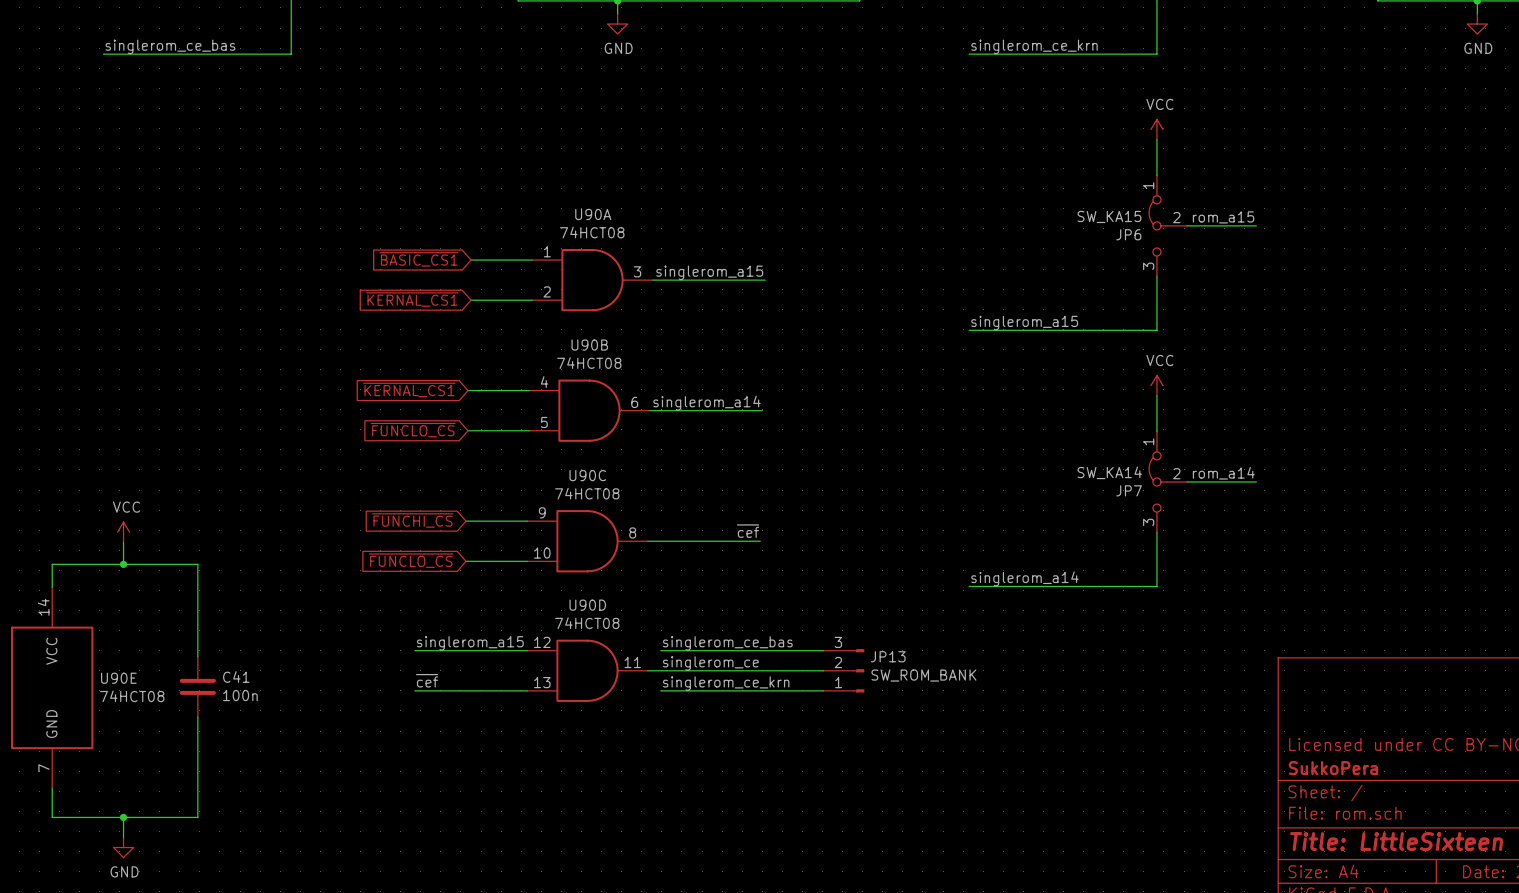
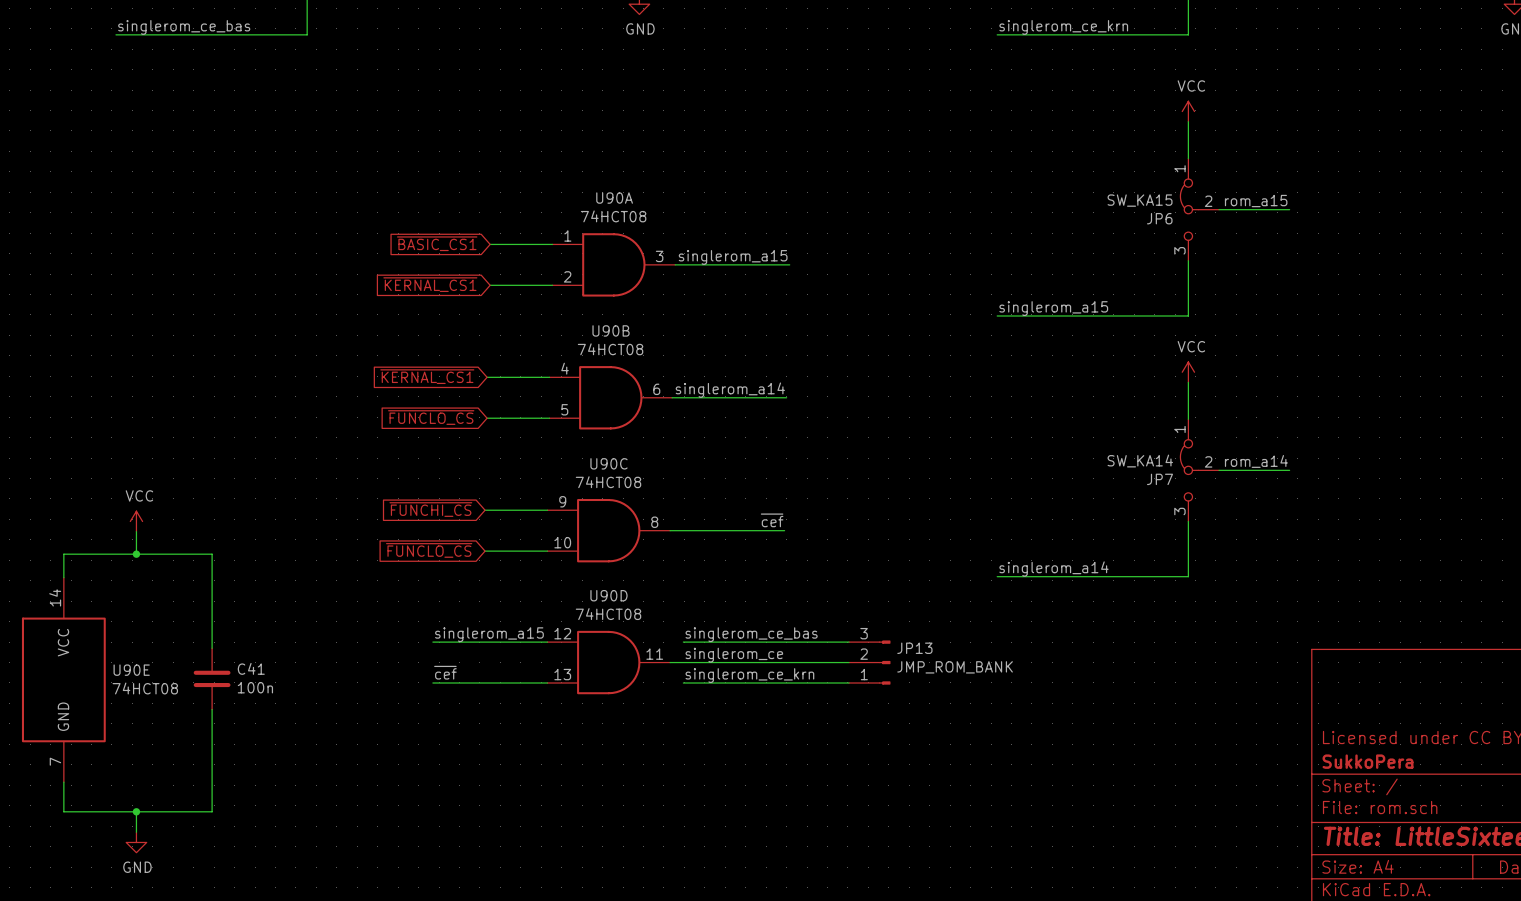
JP13 value: SW_ROM_BANK (923, 675) -> JMP_ROM_BANK (955, 667)

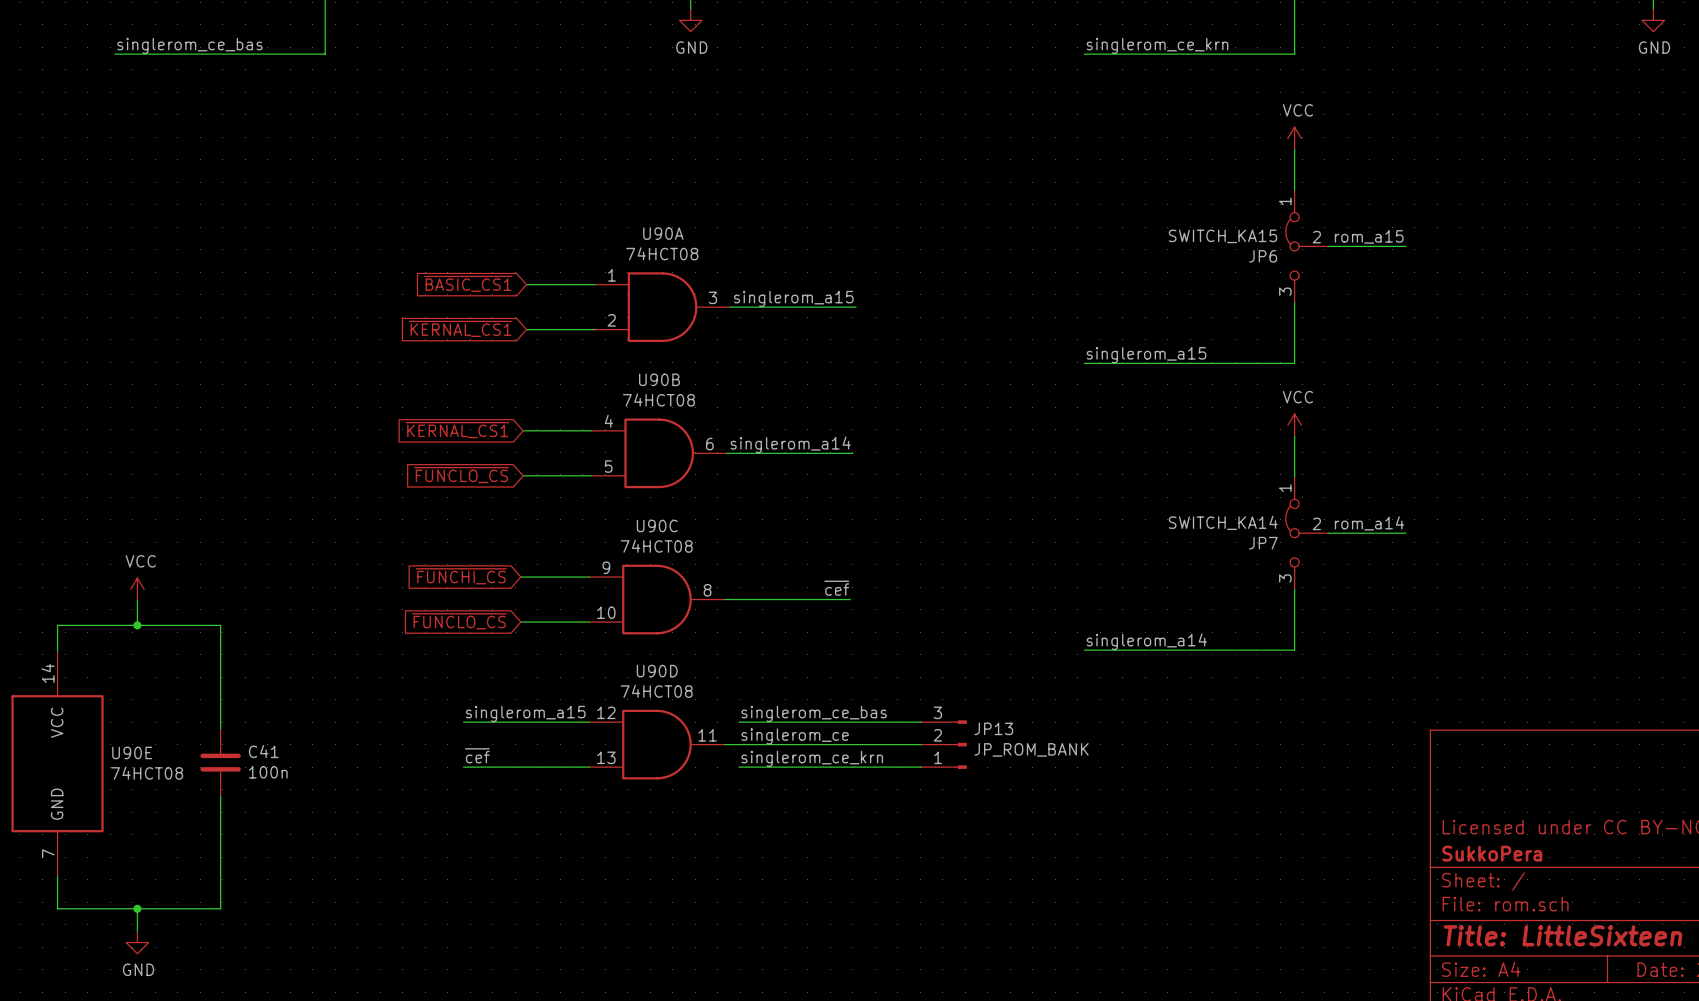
JP6 value: SW_KA15 (1140, 200) -> SWITCH_KA15 (1222, 236)
JP7 value: SW_KA14 (1140, 461) -> SWITCH_KA14 (1223, 522)
JP13 value: JMP_ROM_BANK (955, 667) -> JP_ROM_BANK (1031, 749)

